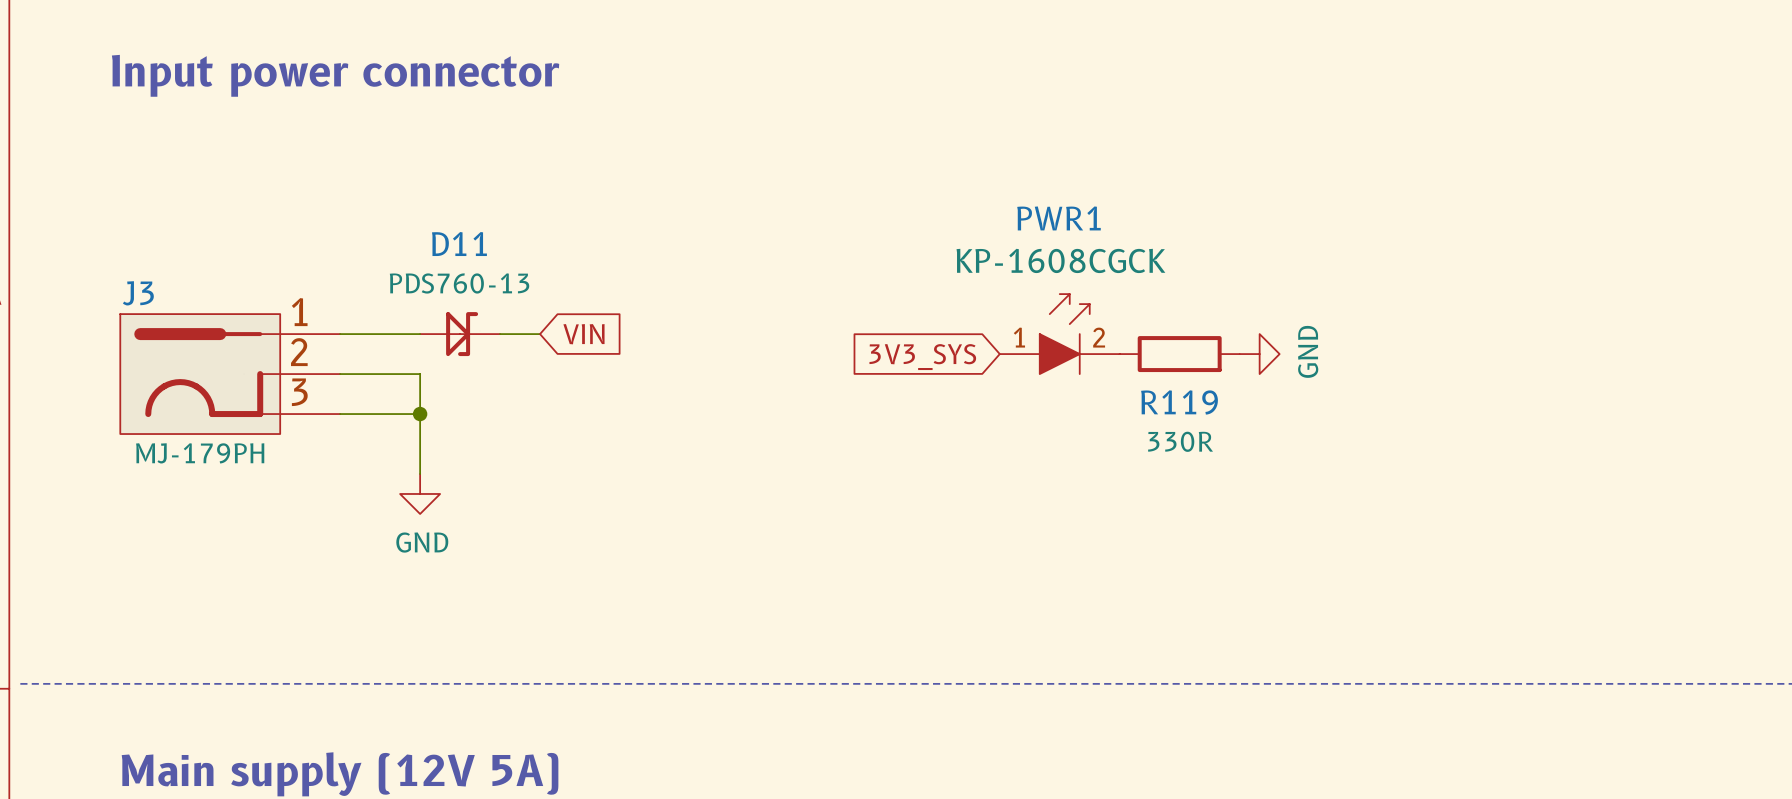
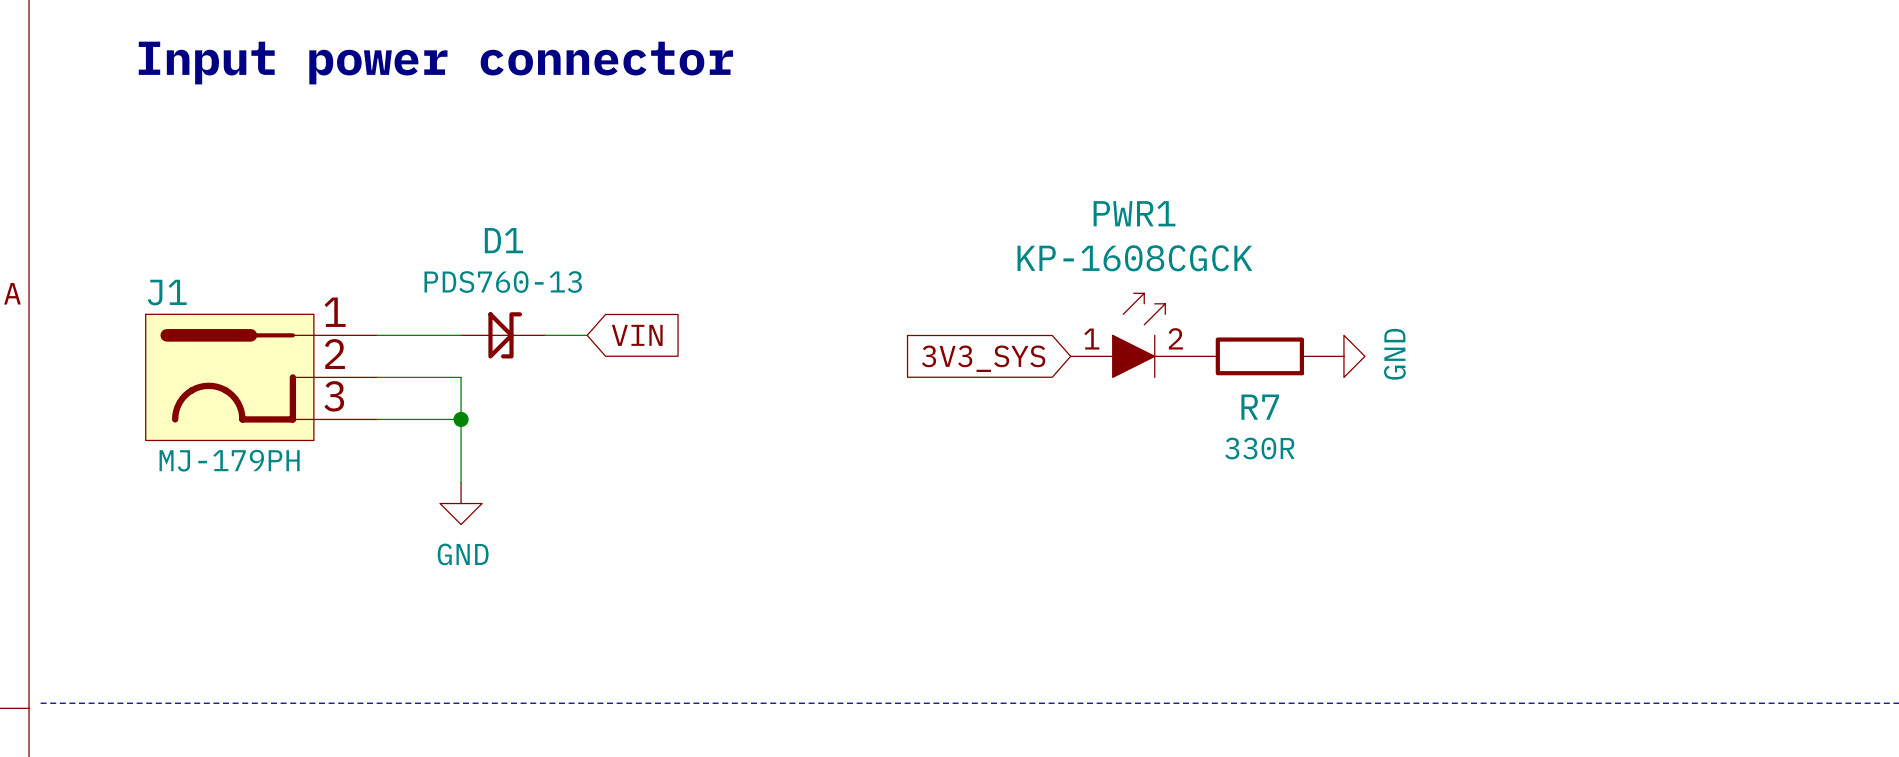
D11 name: D11 (459, 244) -> D1 (503, 240)
J3 name: J3 (138, 293) -> J1 (167, 292)
R119 name: R119 (1179, 402) -> R7 (1260, 407)

